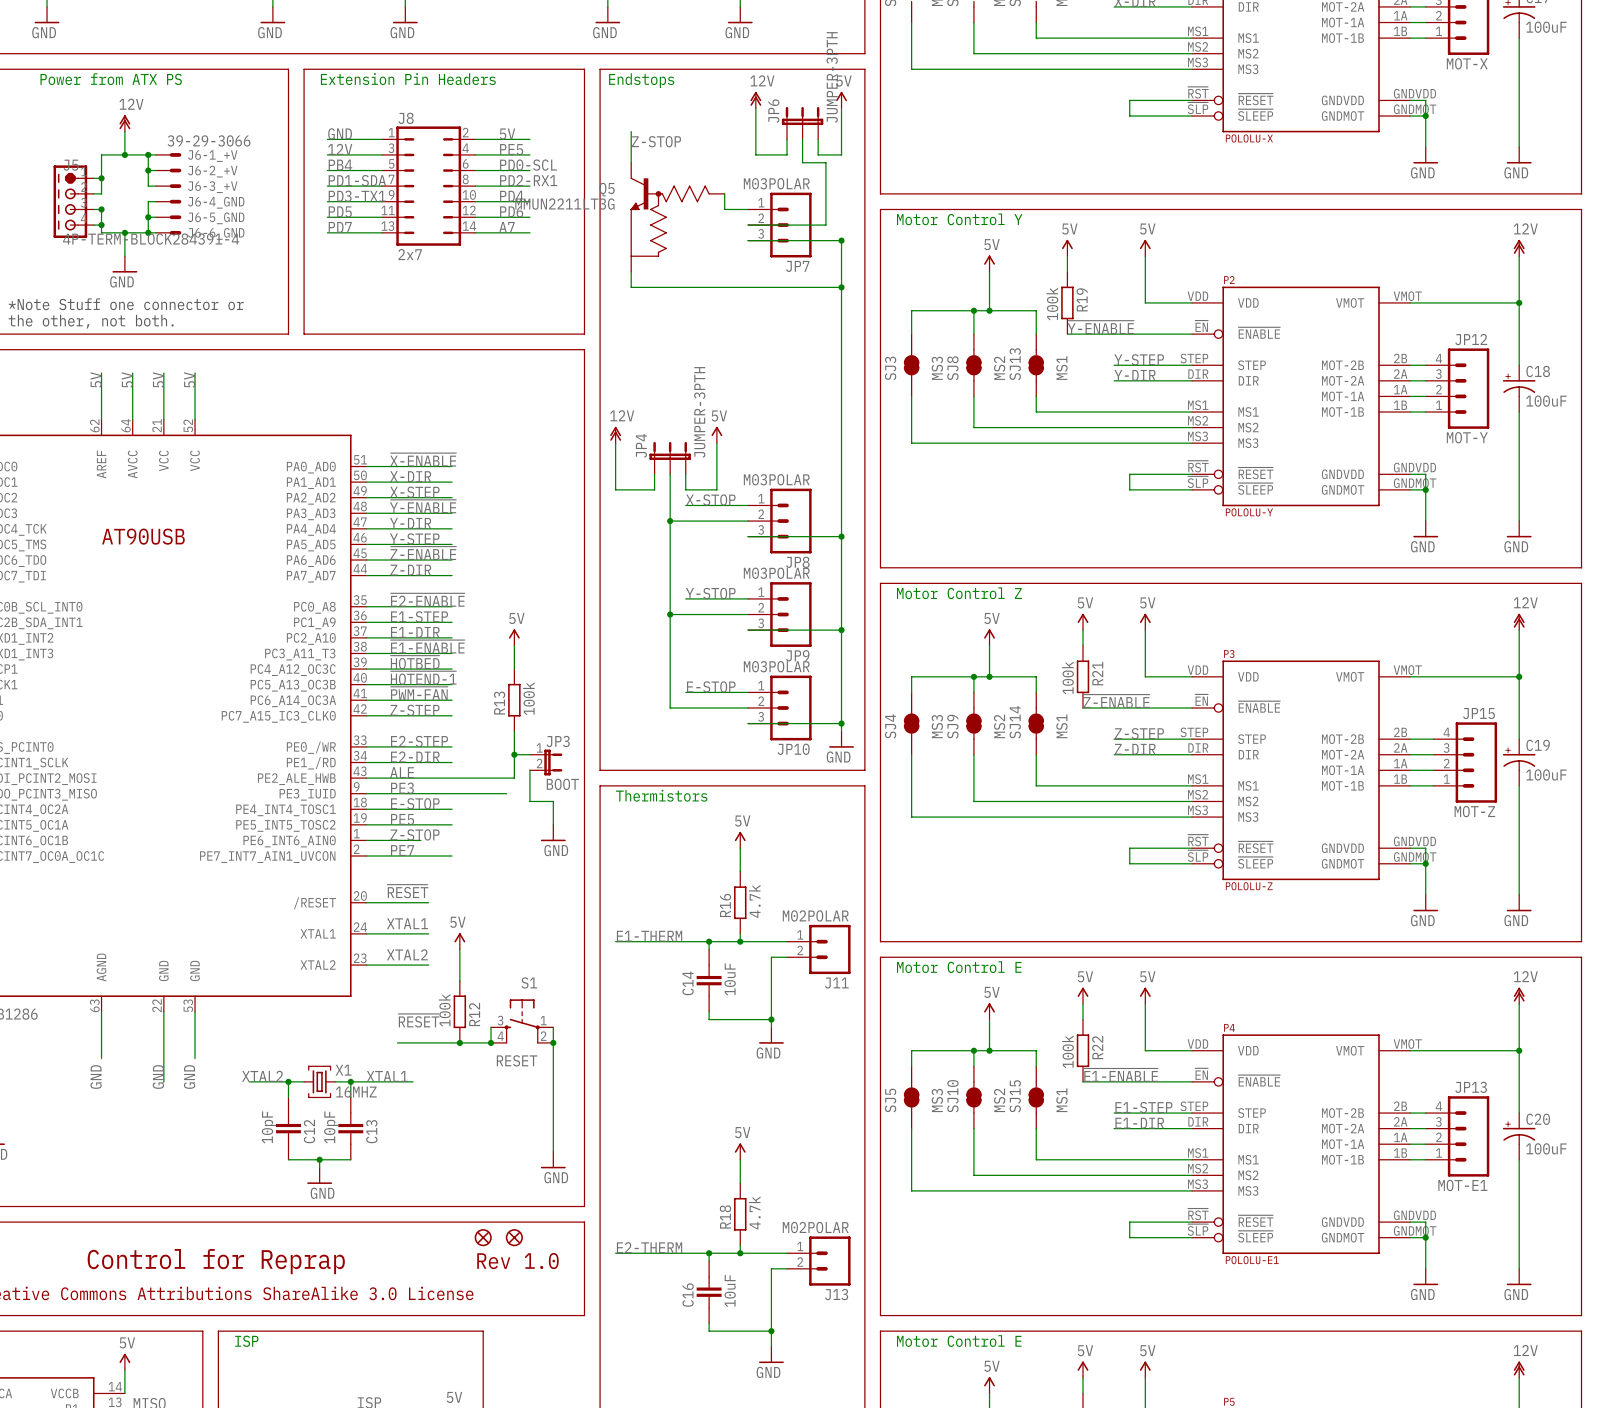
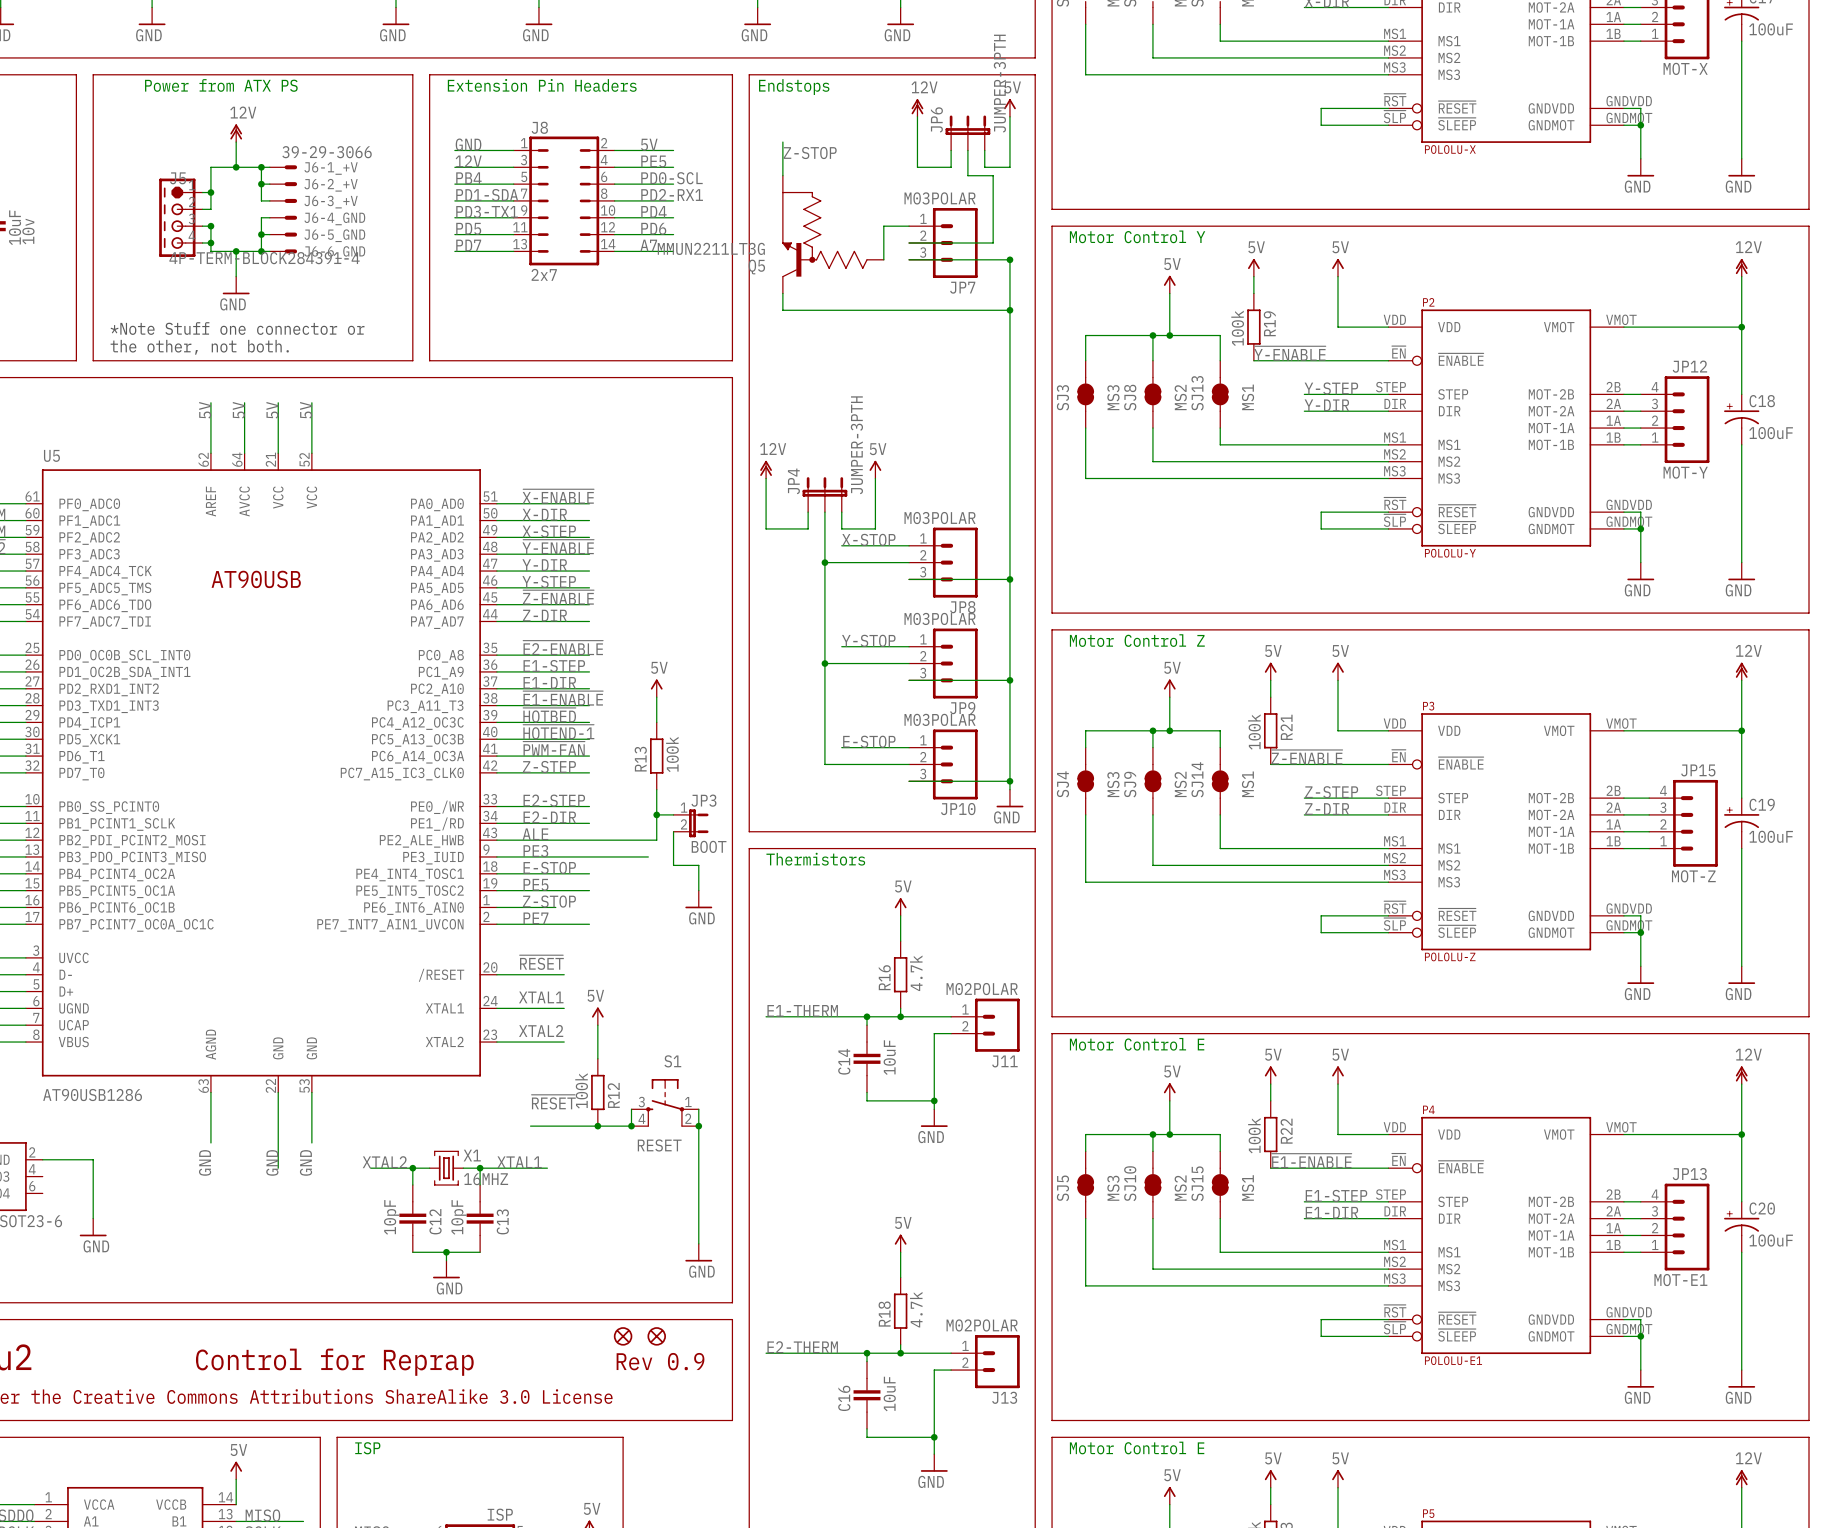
wire: (724, 193) (724, 209) -> (883, 259) (883, 226)
Q5 flip: as is (670, 217) -> up-down (824, 234)
text: Rev 1.0 (517, 1261) -> Rev 0.9 (660, 1361)

